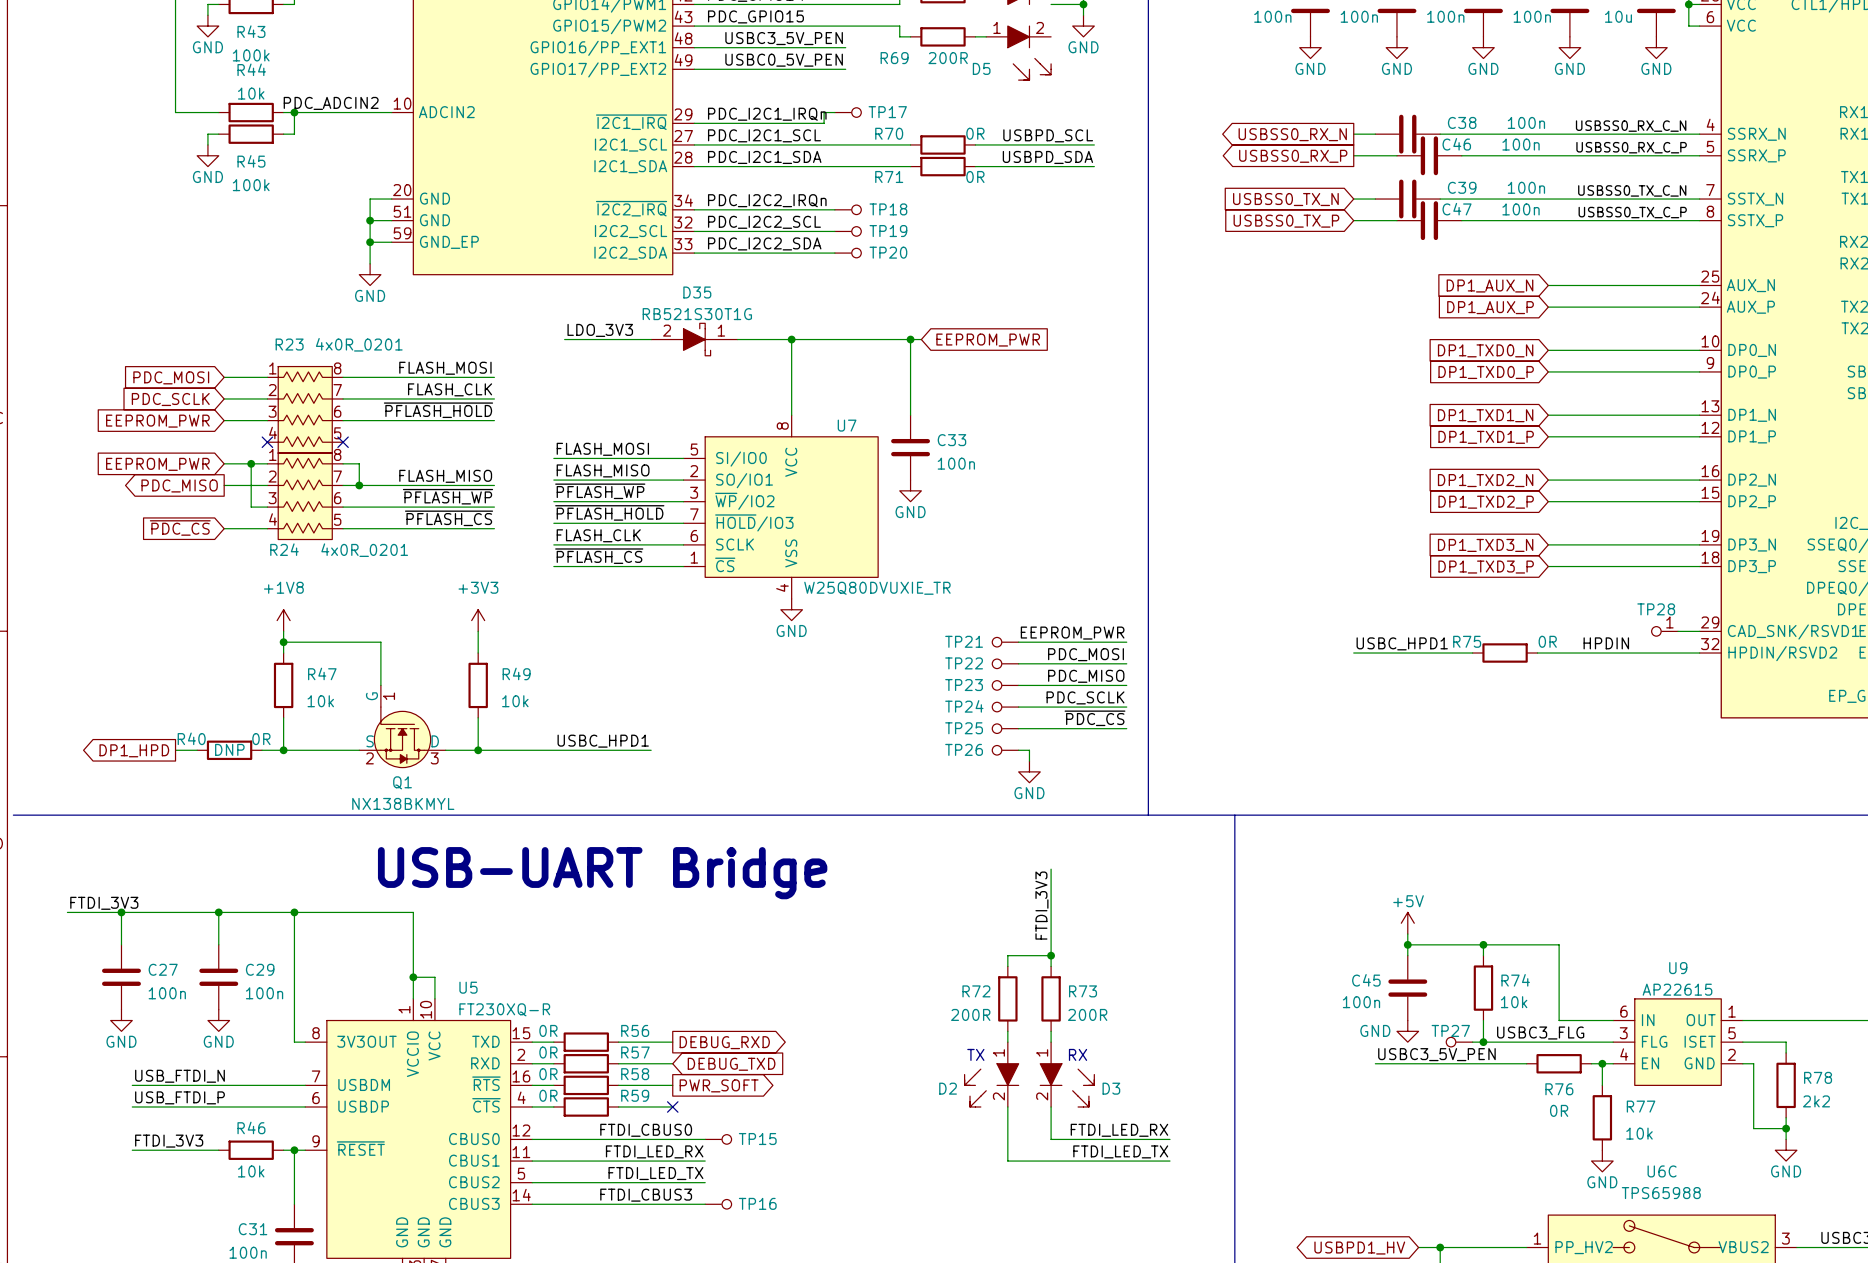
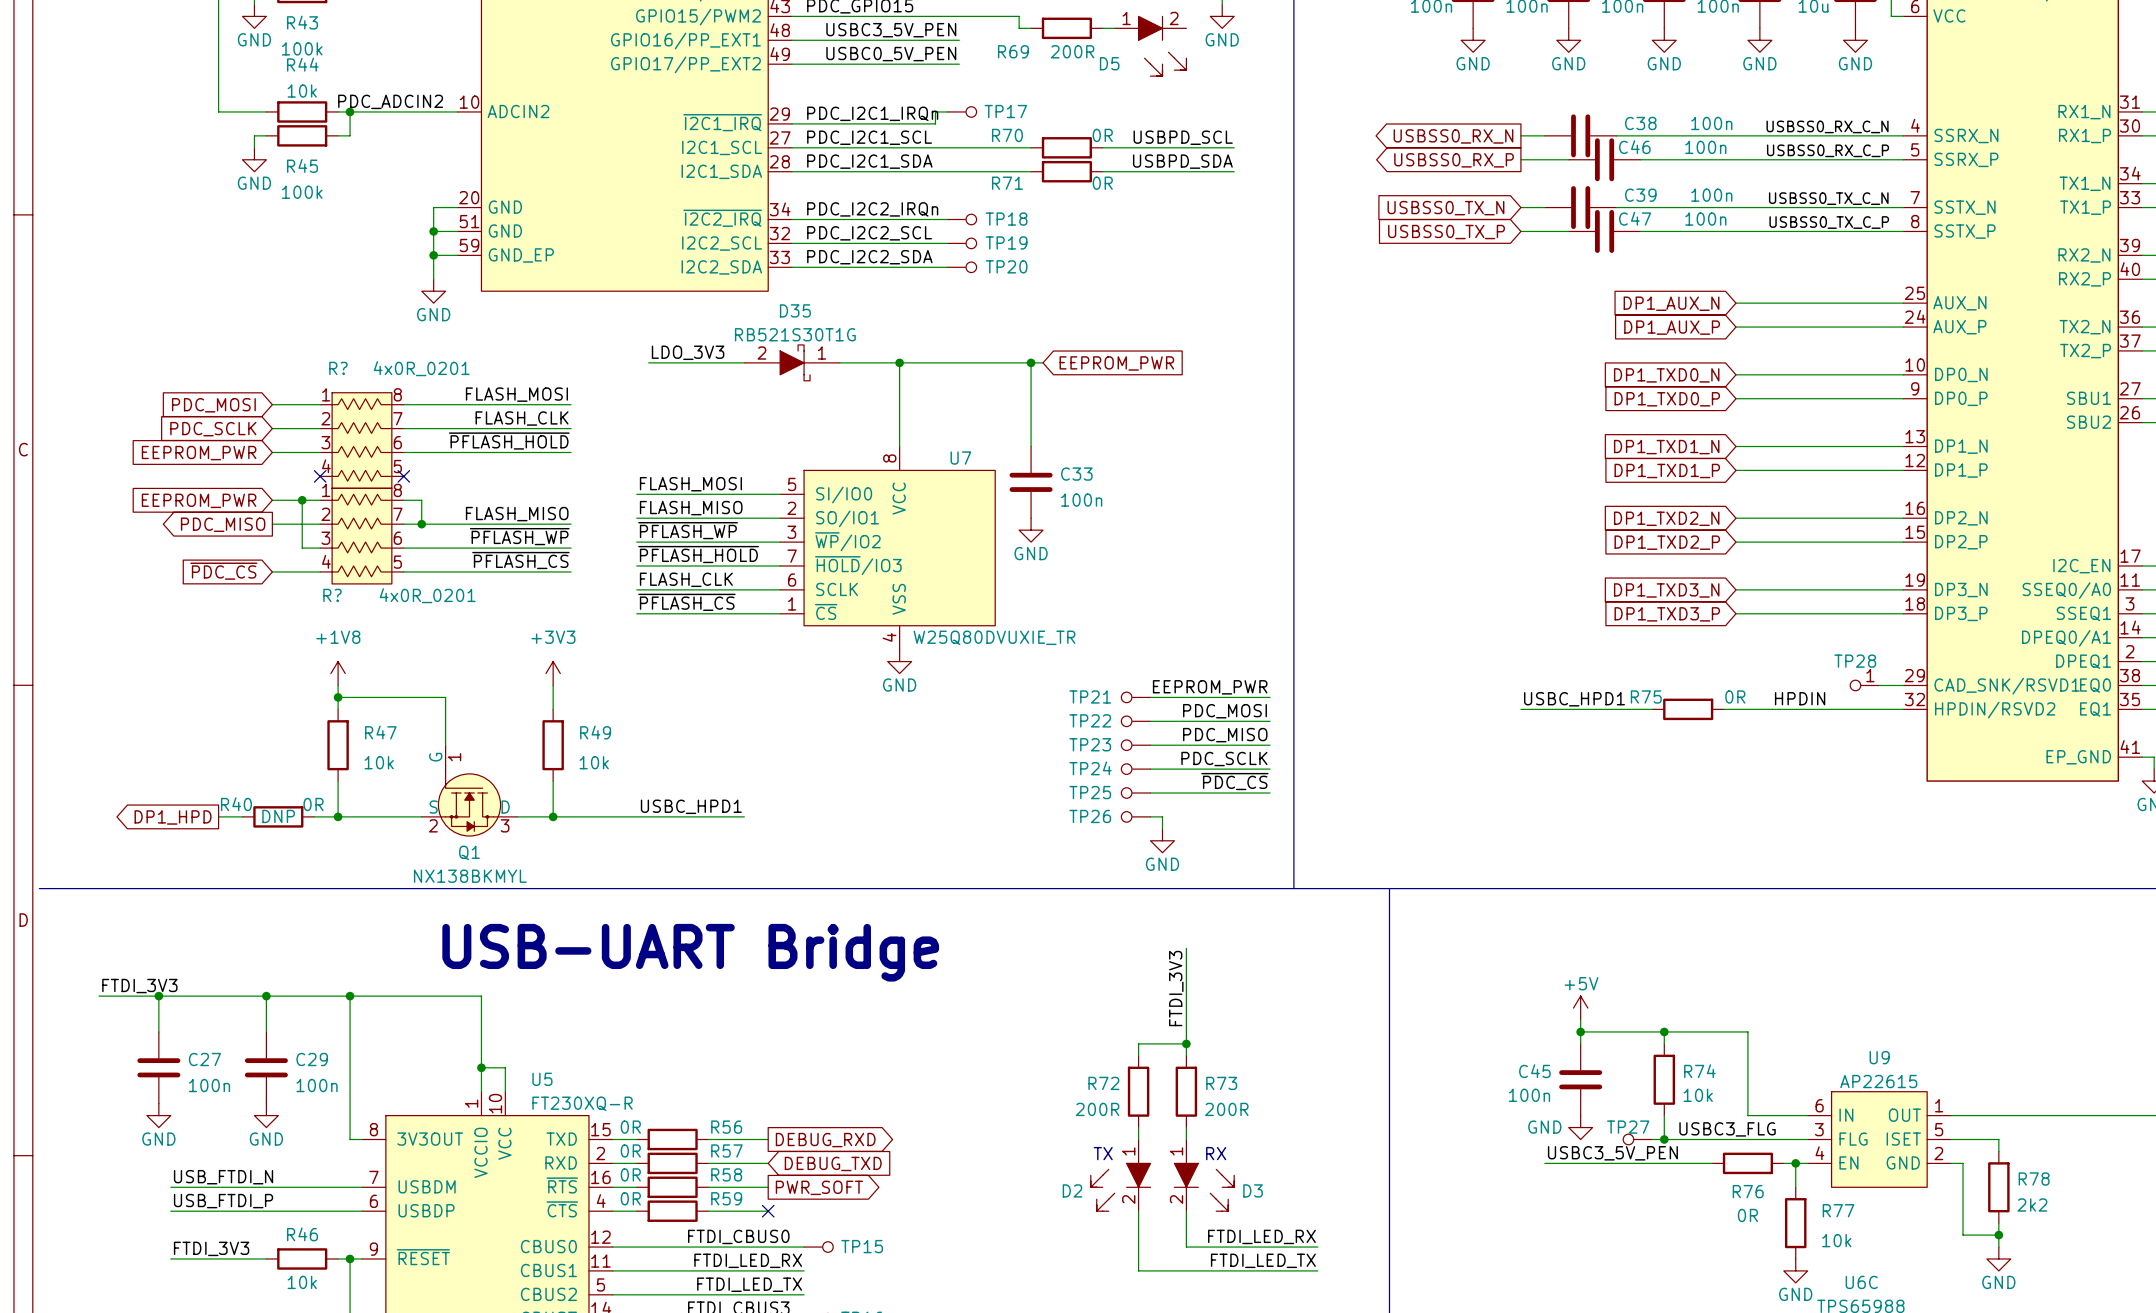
R23 name: R23 (289, 344) -> R? (338, 368)
R24 name: R24 (284, 549) -> R? (332, 595)

